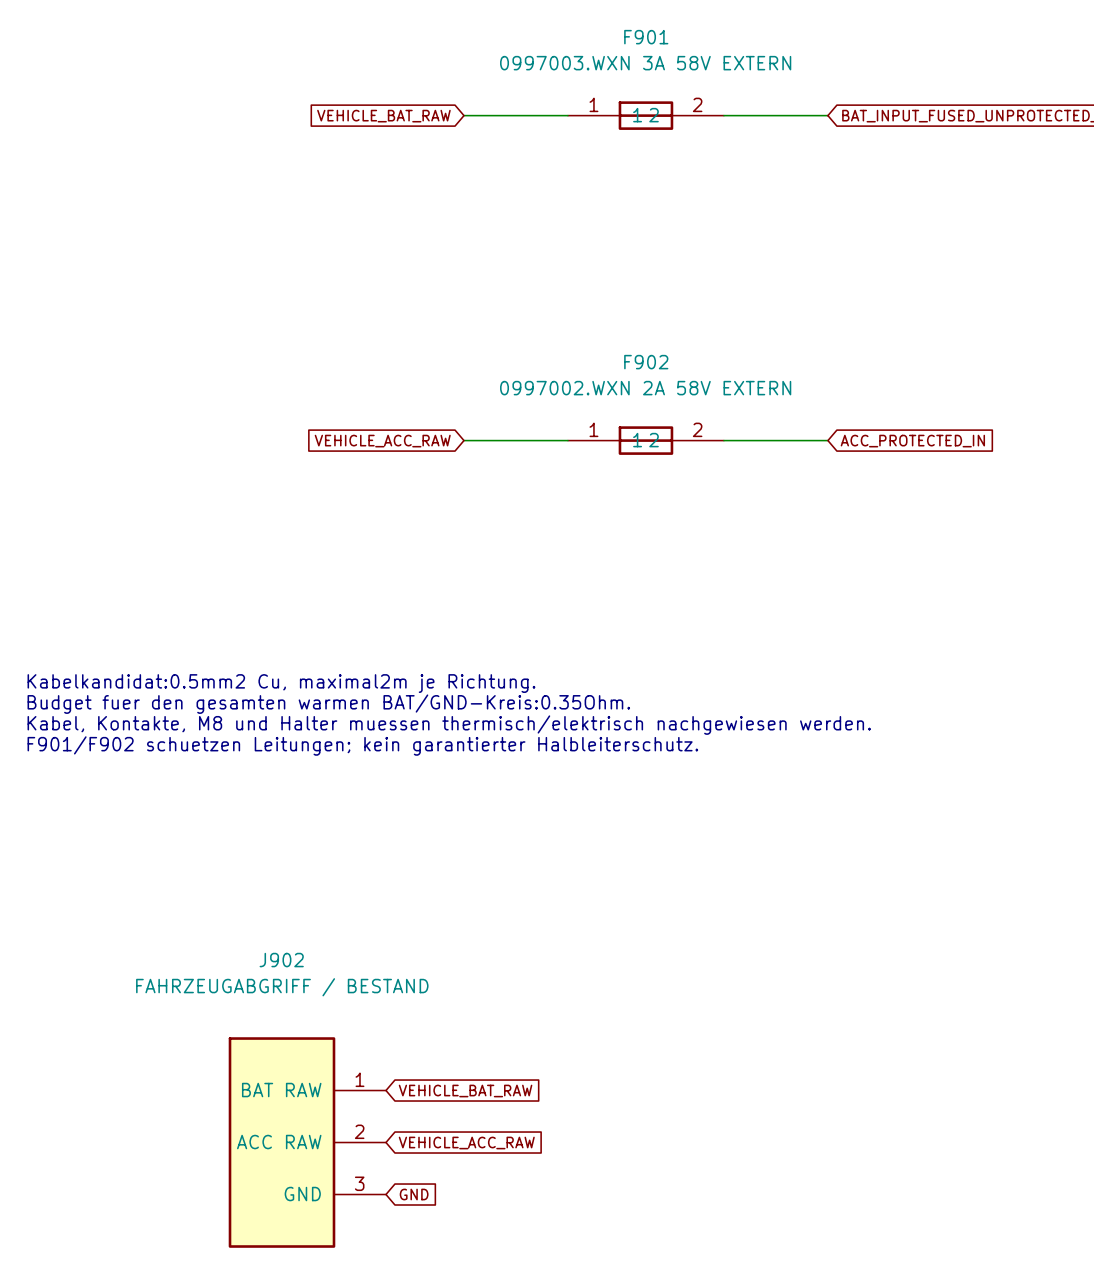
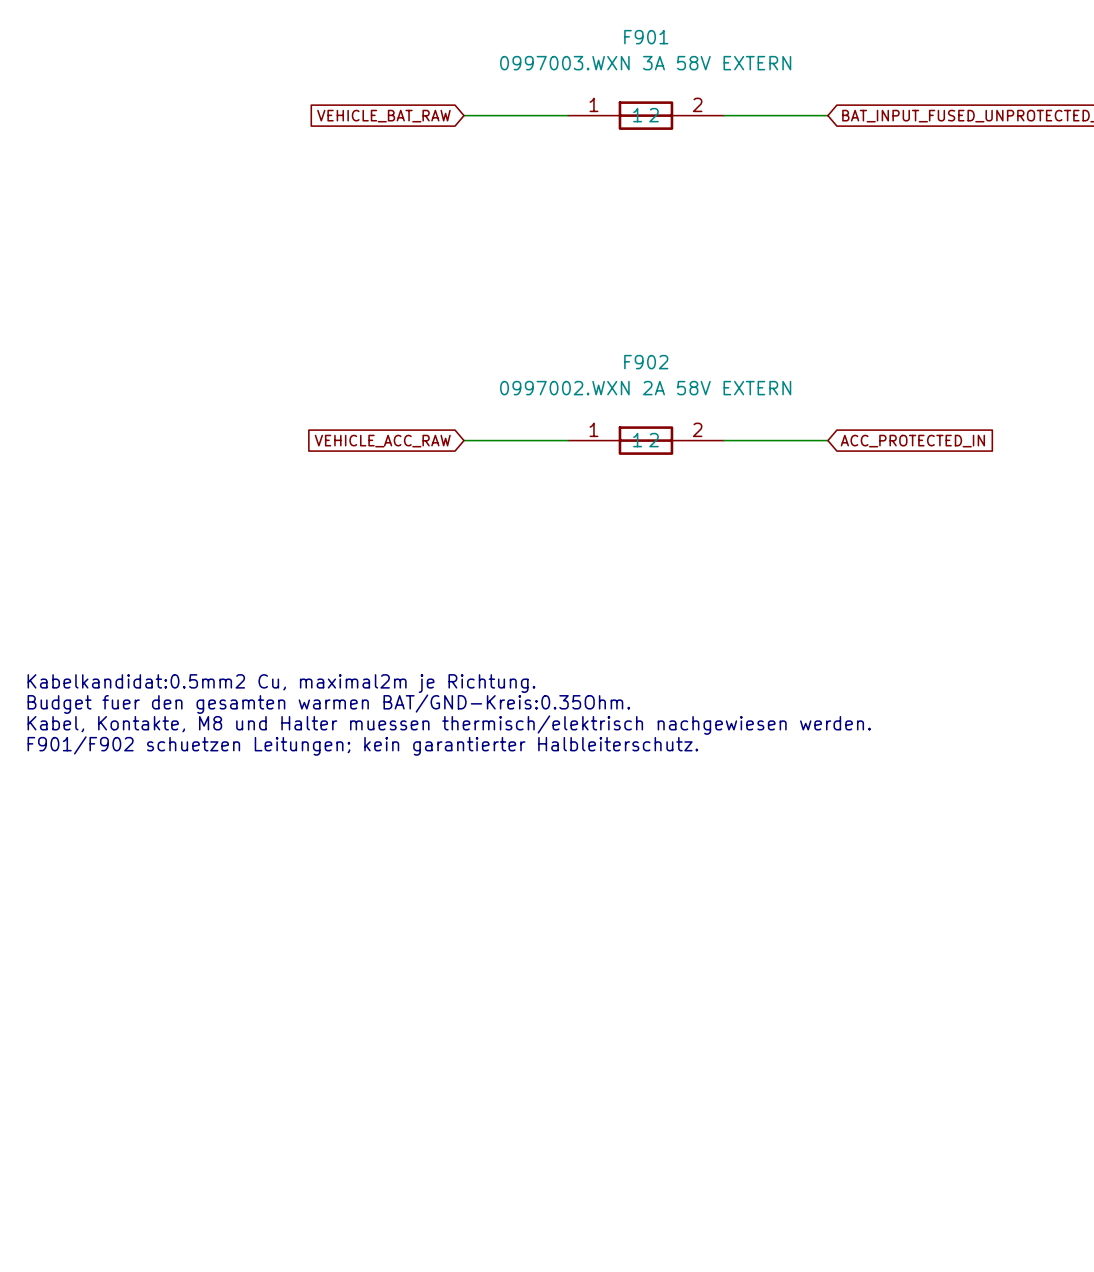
global label: VEHICLE_BAT_RAW (465, 1091) -> none
J902: FAHRZEUGABGRIFF / BESTAND (307, 1142) -> none
global label: VEHICLE_ACC_RAW (466, 1143) -> none
global label: GND (414, 1194) -> none

